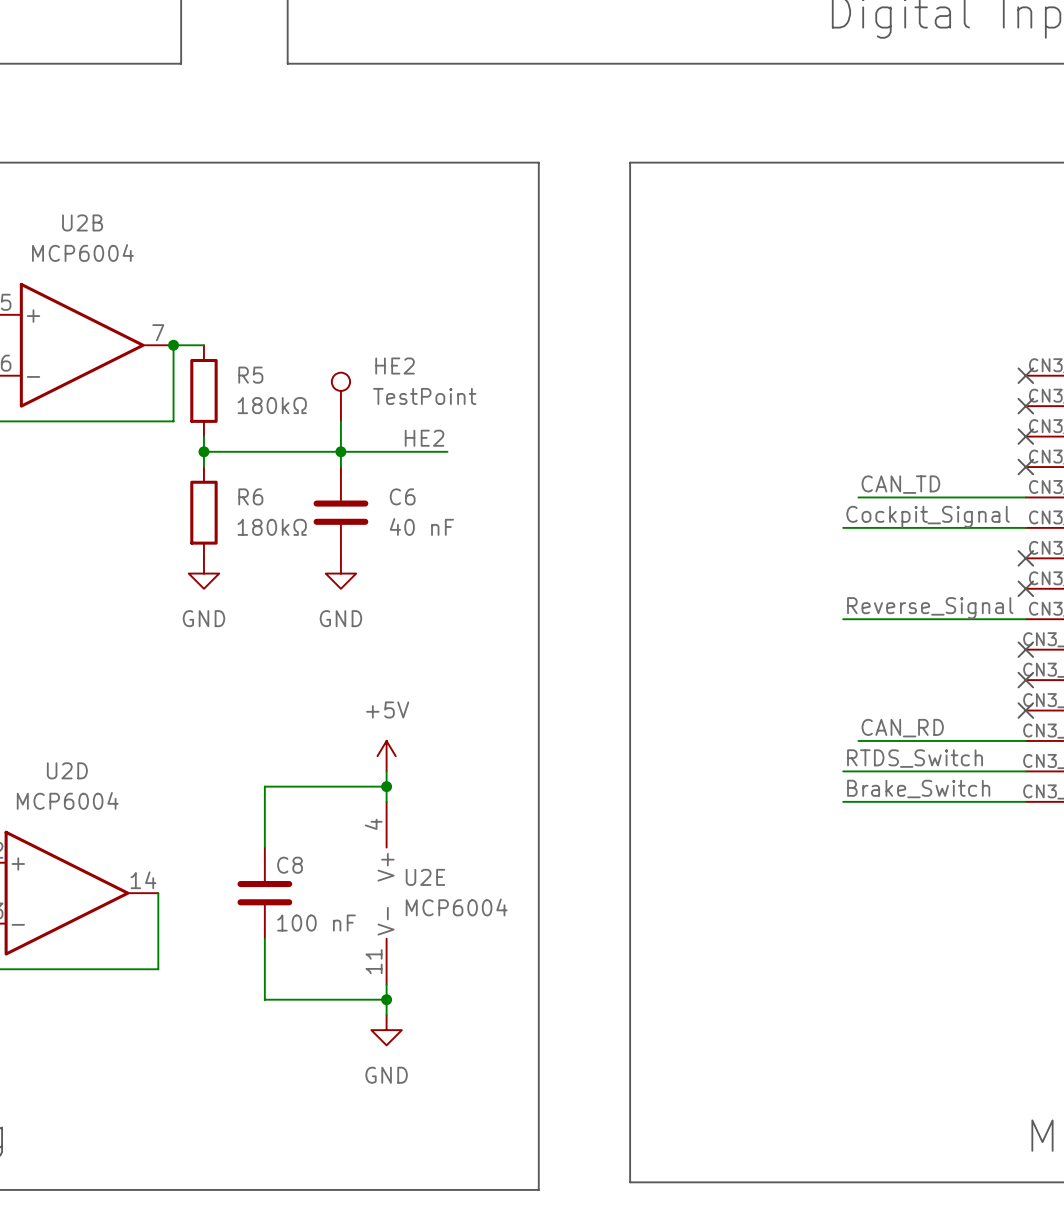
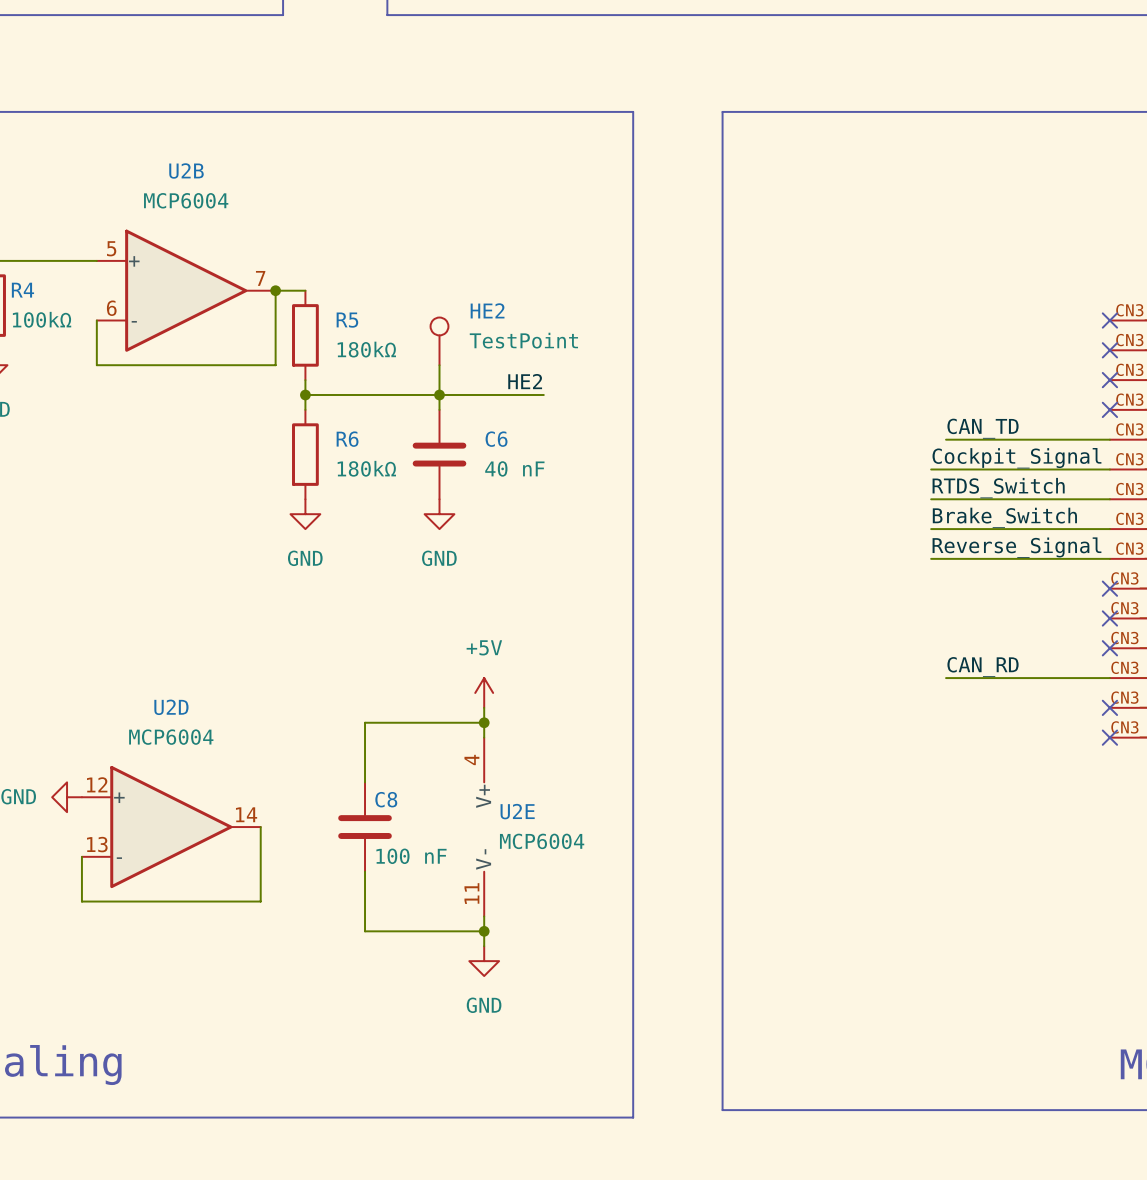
no-connect mark: (1025, 558) -> none
no-connect mark: (1025, 588) -> none
label position: RTDS_Switch (915, 758) -> RTDS_Switch (998, 488)
wire: (843, 771) (1025, 771) -> (931, 529) (1109, 529)
no-connect mark: none -> (1109, 707)
label position: Brake_Switch (918, 788) -> Brake_Switch (1004, 517)
wire: (843, 801) (1025, 801) -> (931, 499) (1109, 499)
no-connect mark: none -> (1109, 737)

